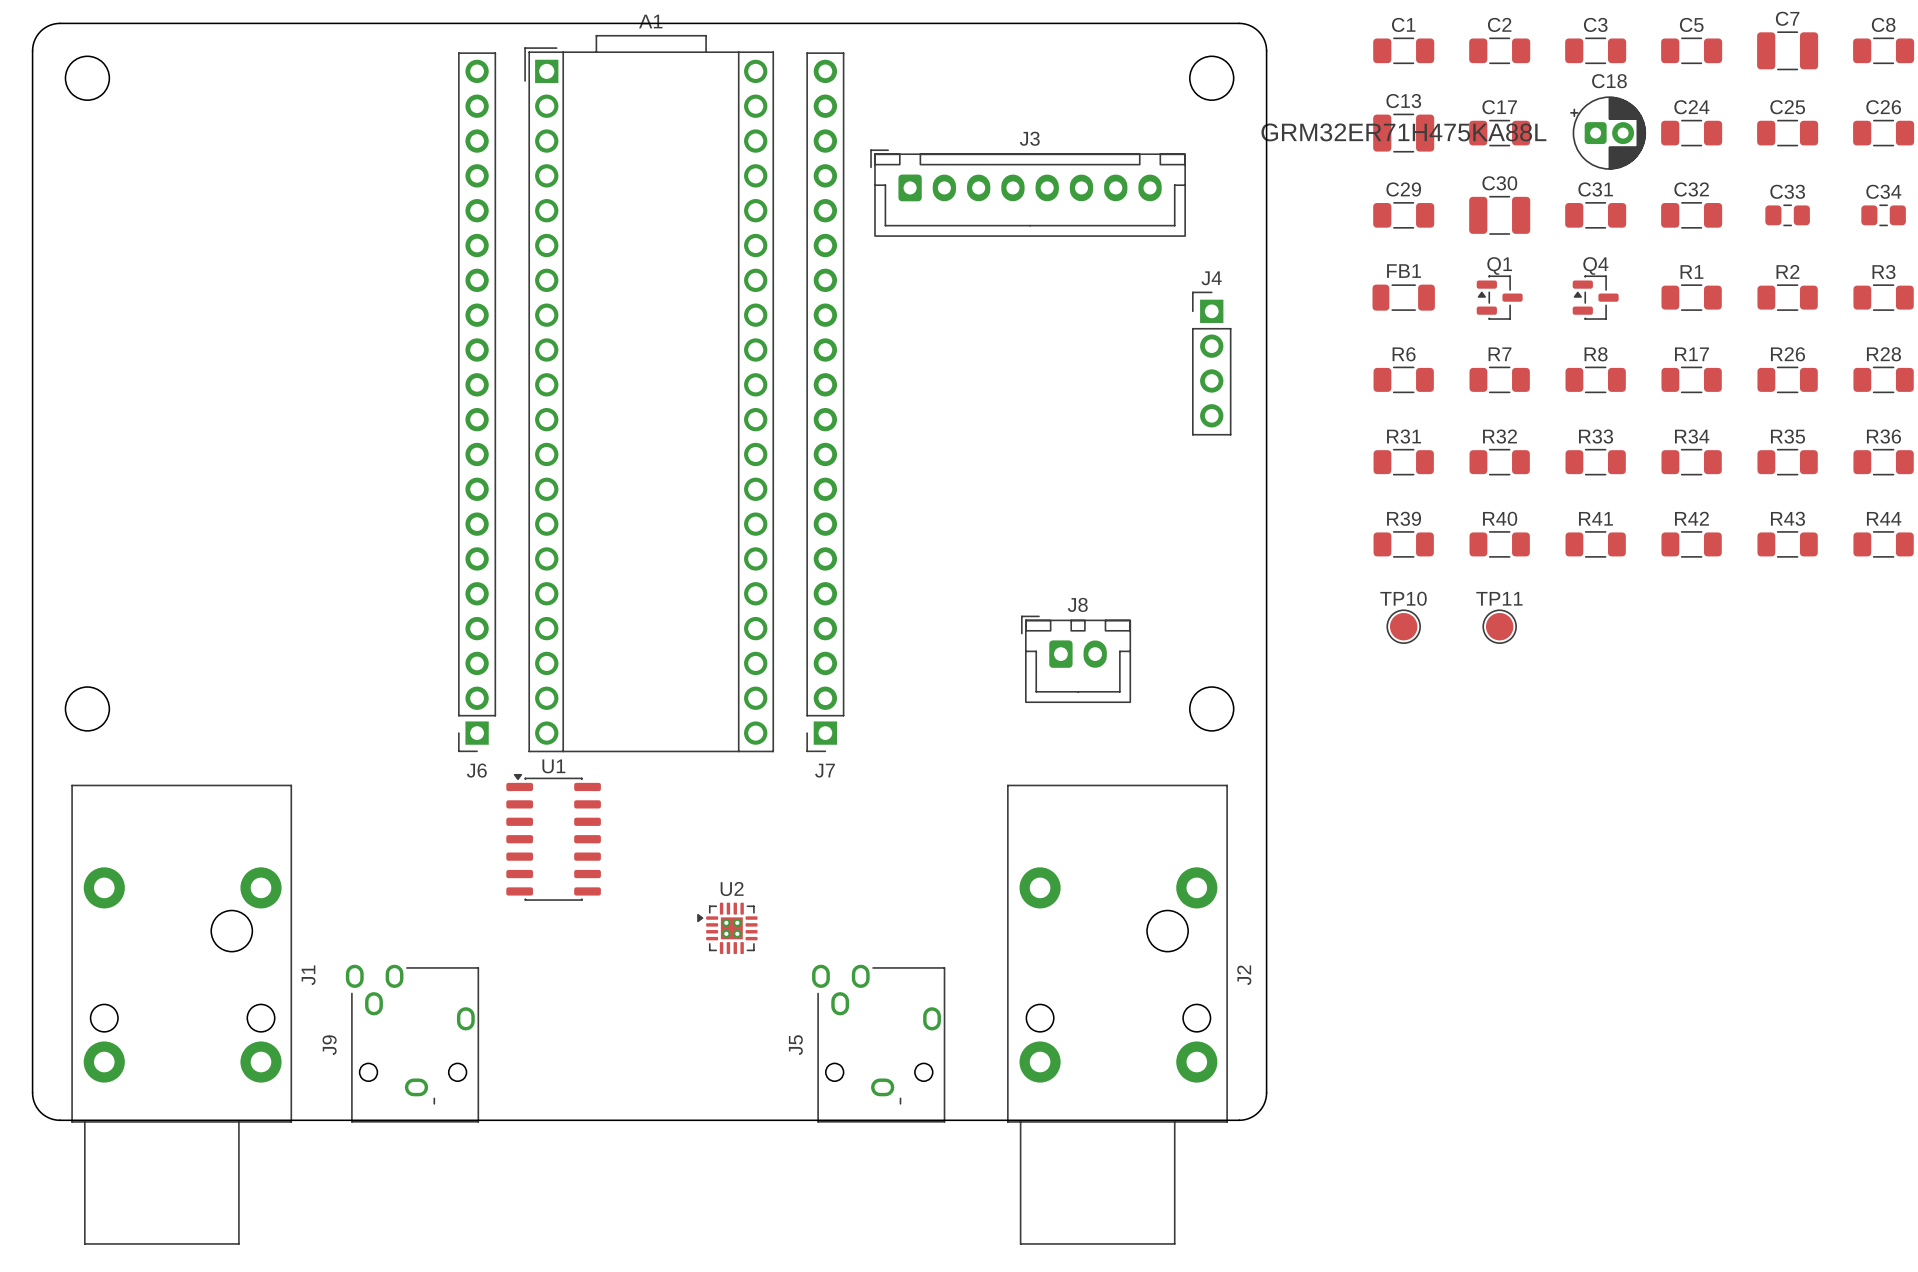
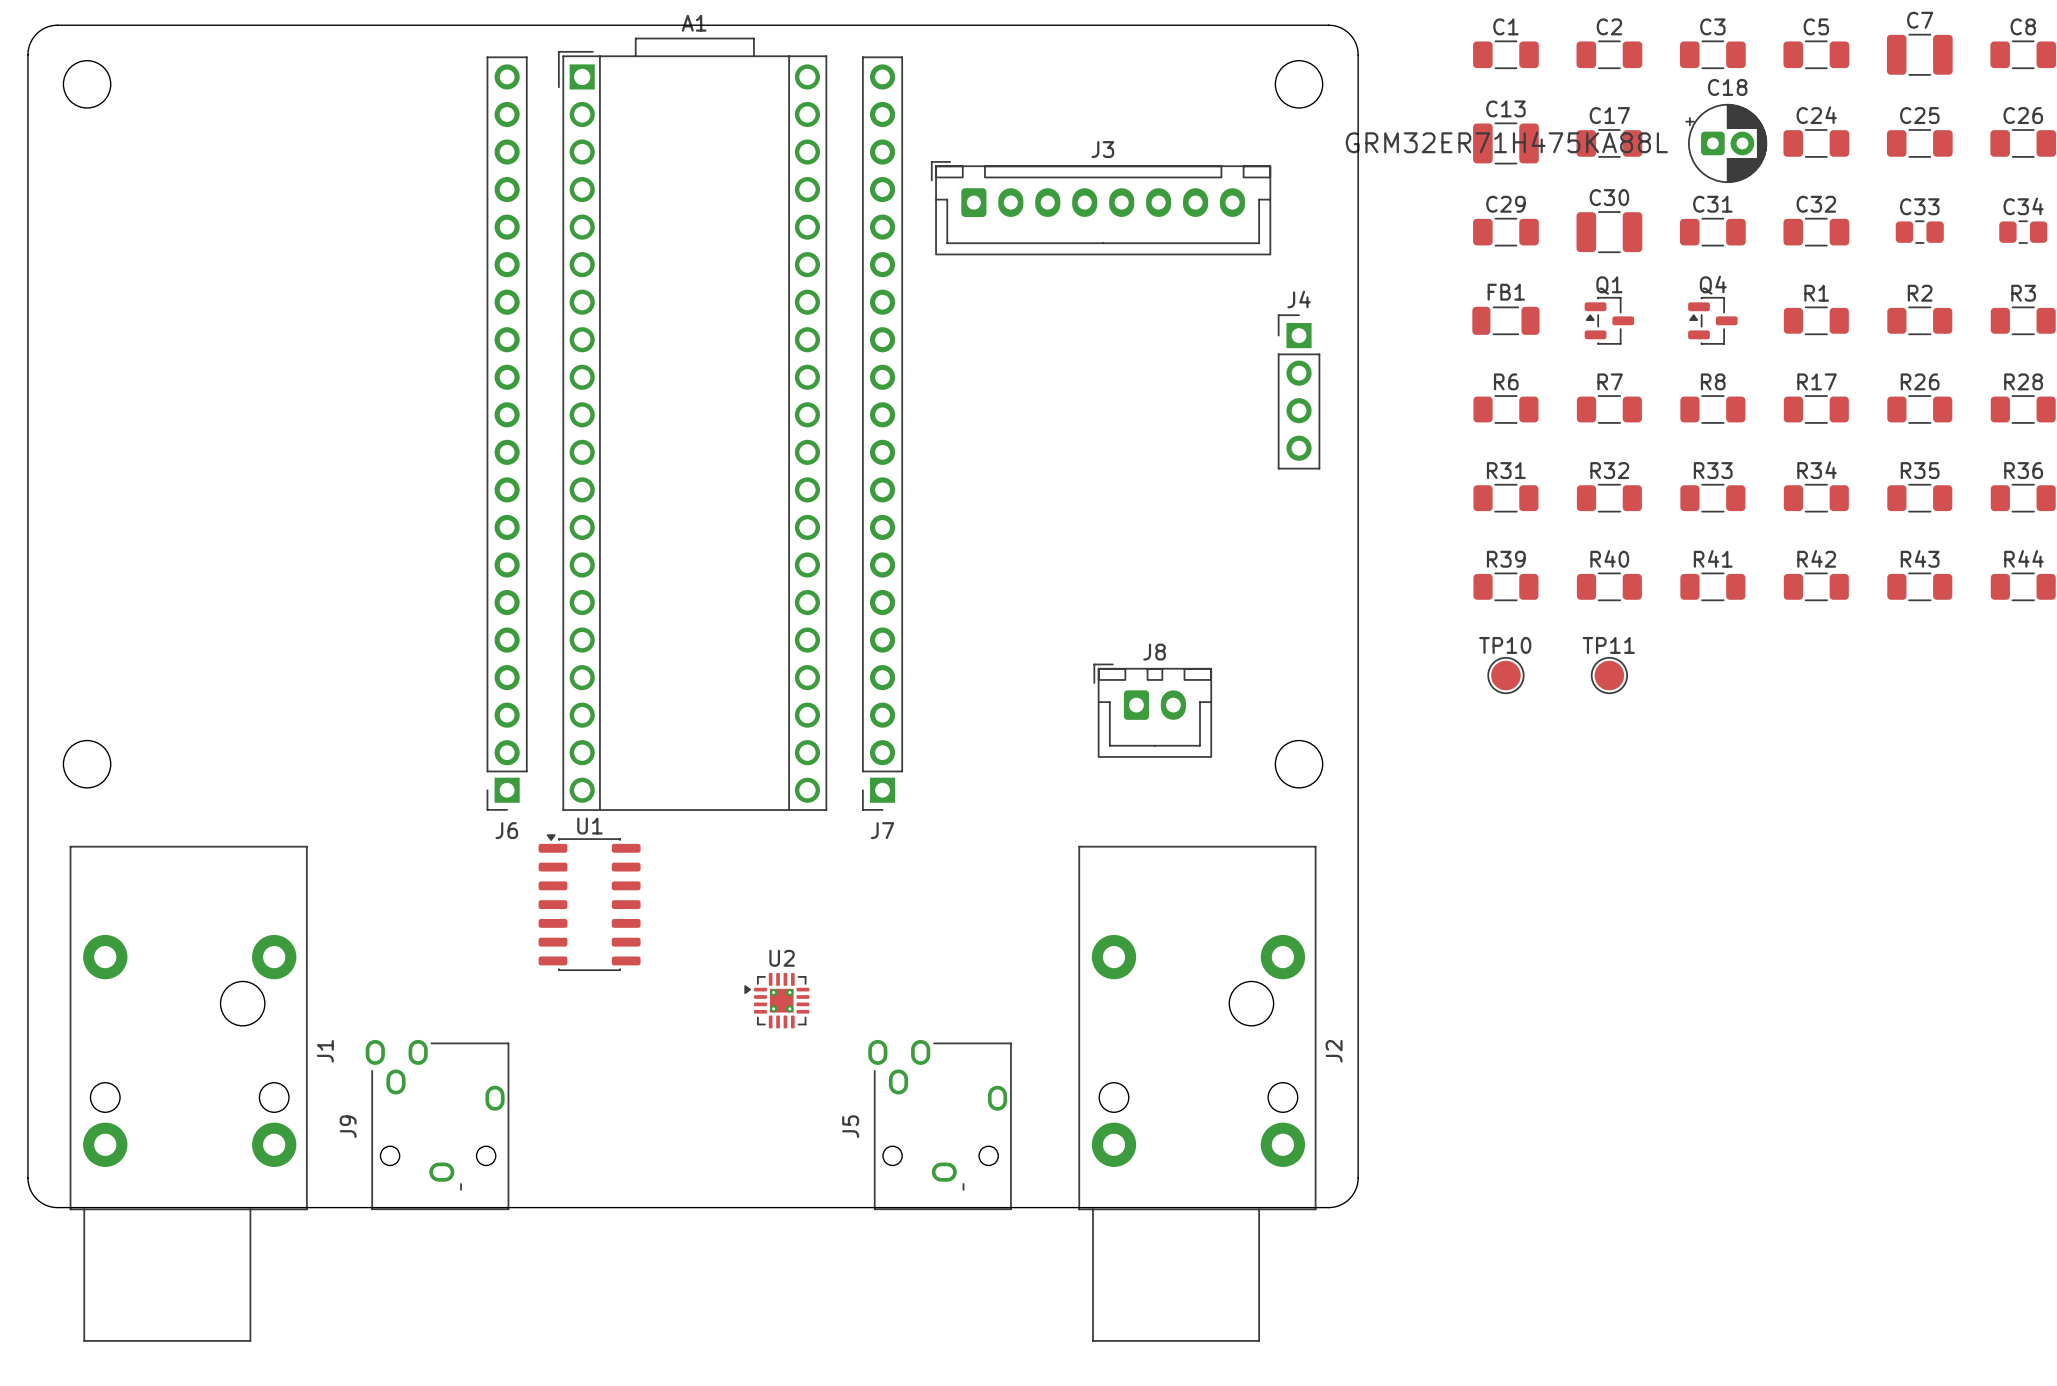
U2 footprint: [697, 902, 758, 955] -> [744, 972, 810, 1029]
via: (726, 922) -> none
via: (737, 922) -> none
via: (726, 933) -> none
via: (737, 933) -> none

